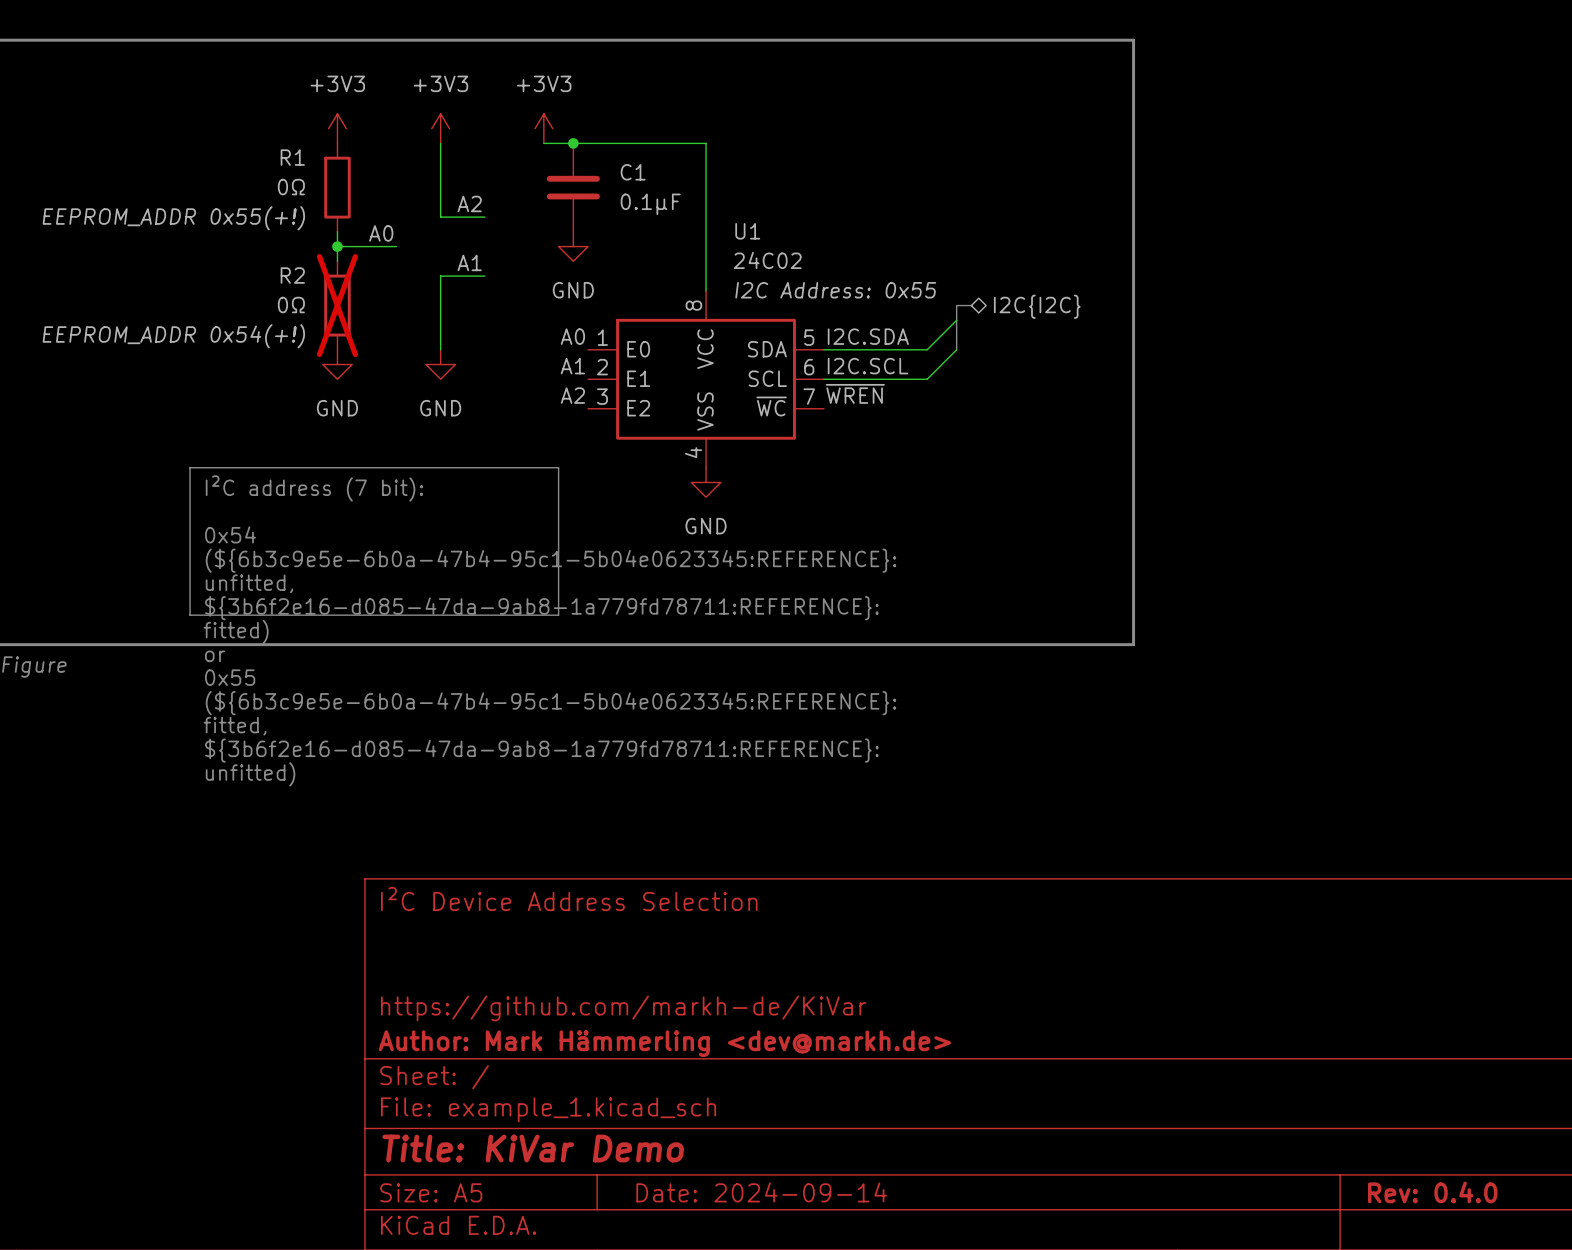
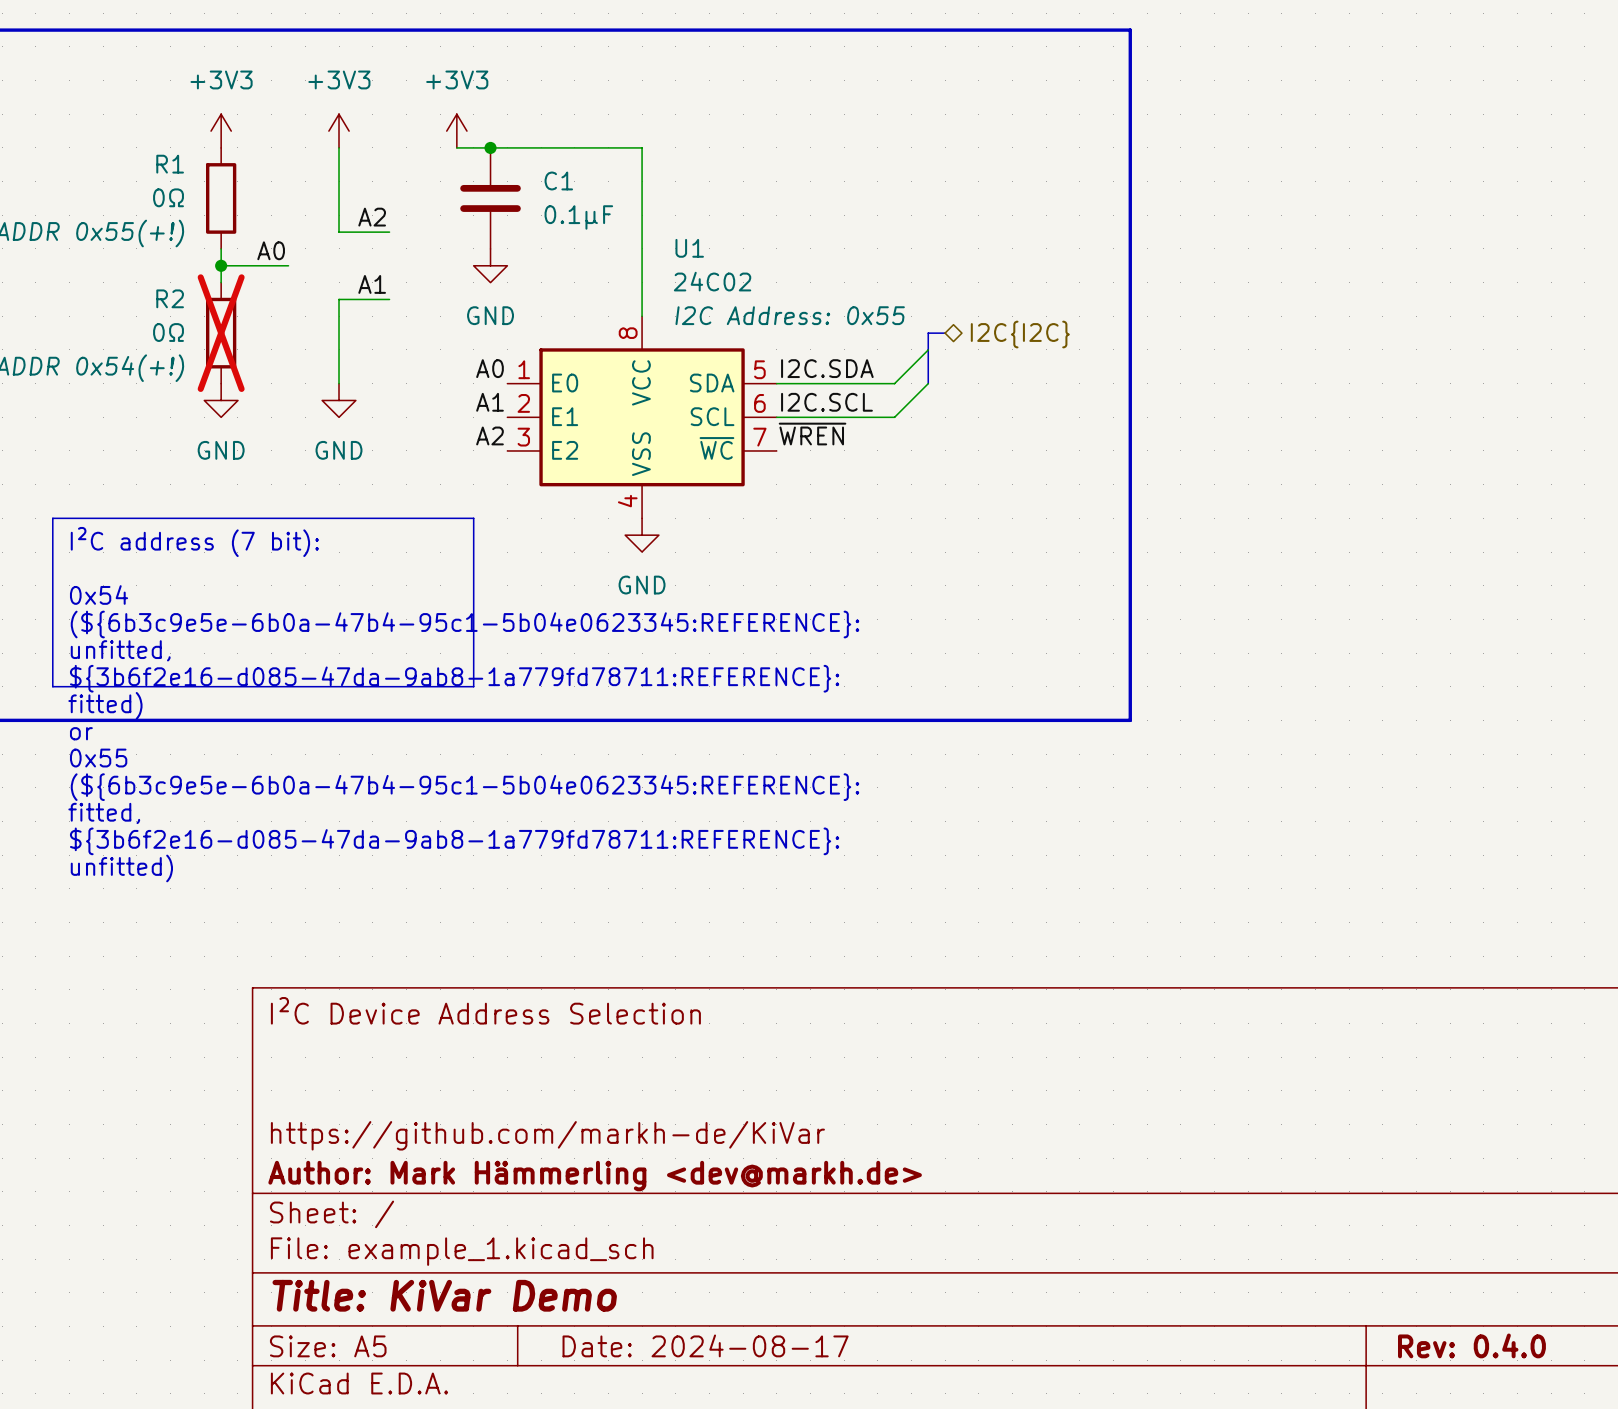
title block: Date: 2024-09-14 (761, 1192) -> Date: 2024-08-17 (705, 1345)

